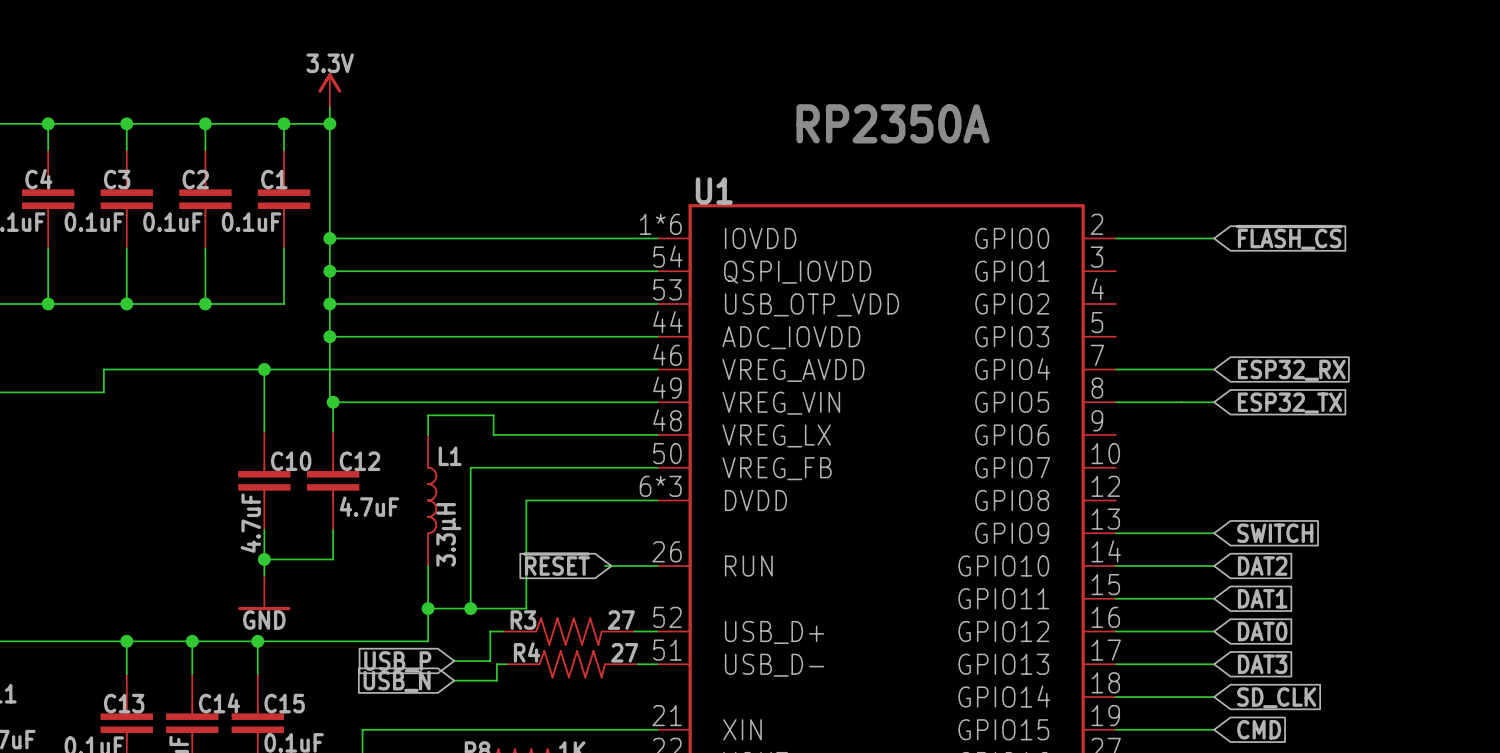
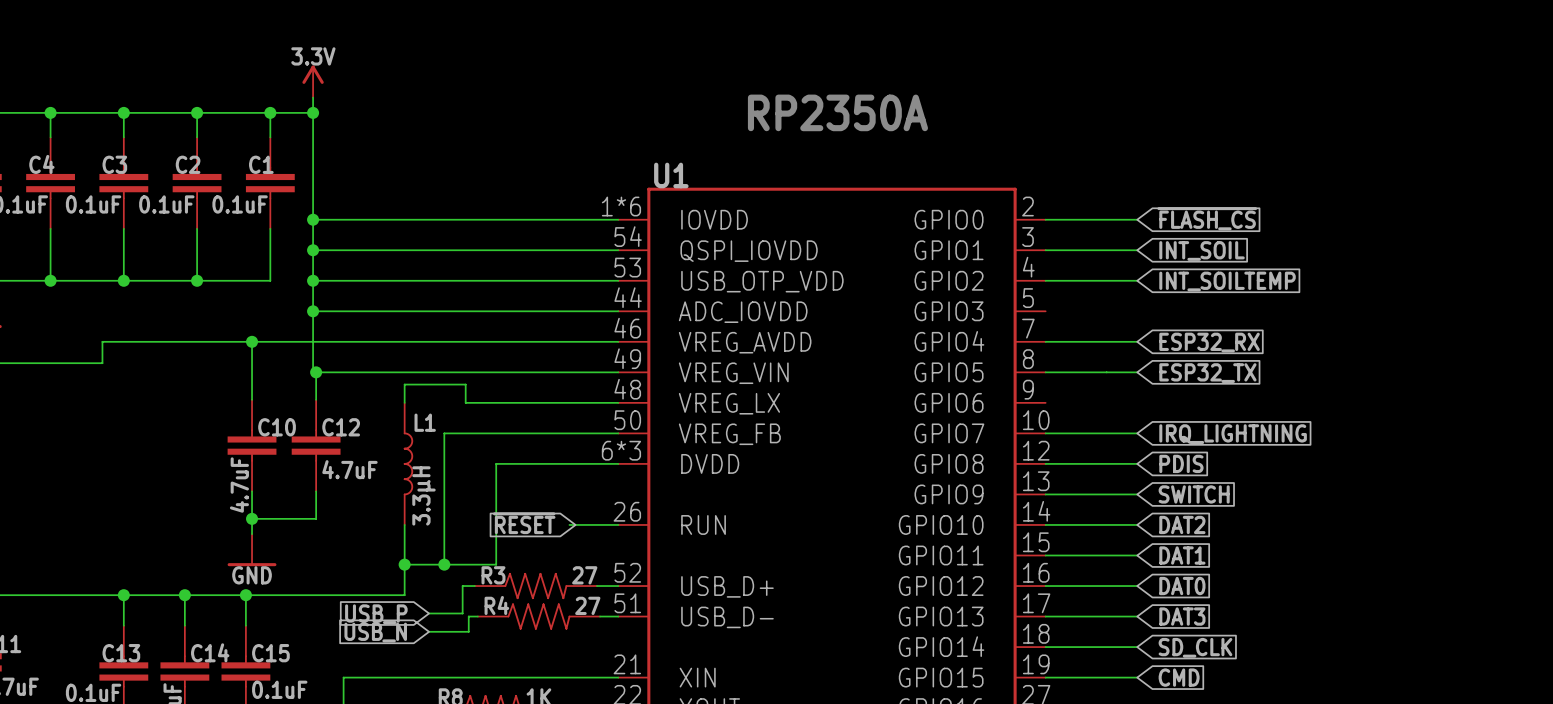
wire: none -> (1045, 250) (1137, 250)
global label: none -> INT_SOIL (1202, 250)
wire: none -> (1045, 280) (1137, 280)
global label: none -> INT_SOILTEMP (1227, 281)
wire: none -> (1045, 433) (1137, 433)
global label: none -> IRQ_LIGHTNING (1233, 434)
wire: none -> (1045, 463) (1137, 463)
global label: none -> PDIS (1181, 463)

